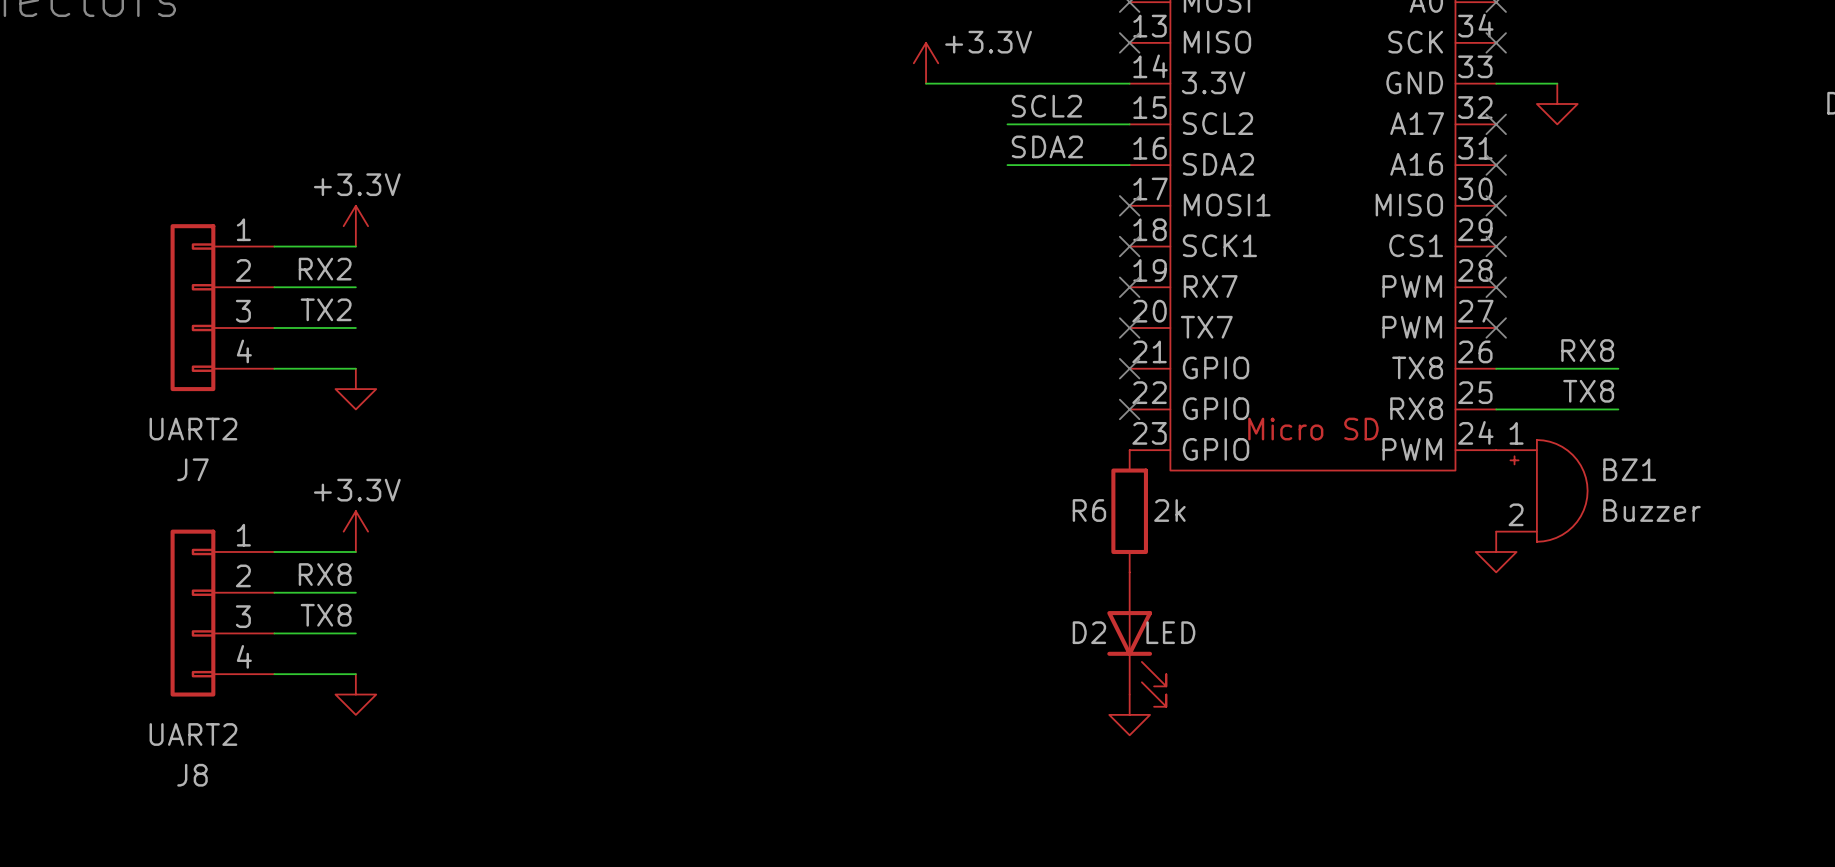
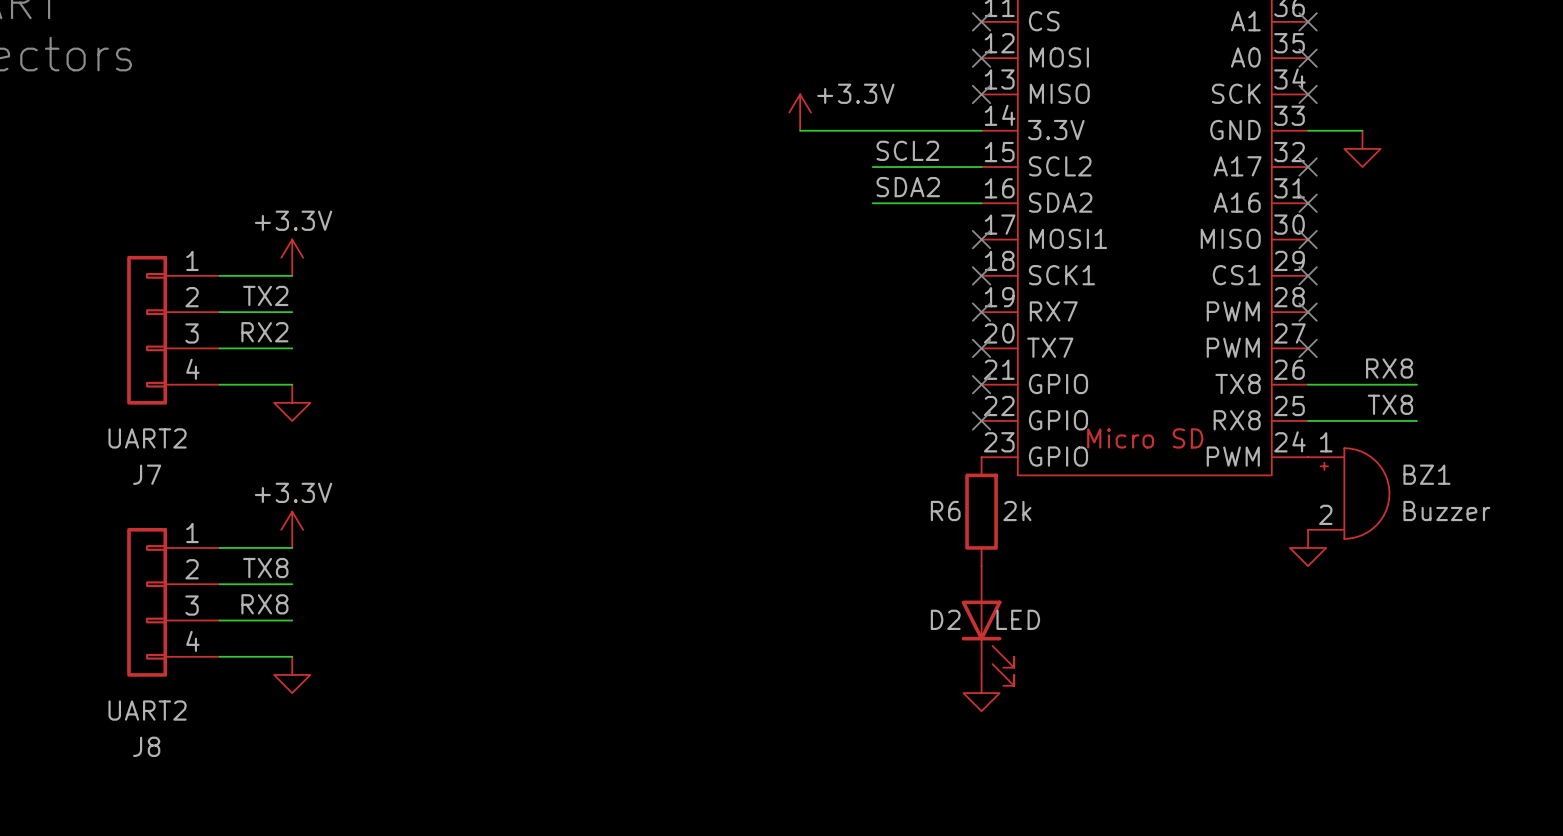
label: RX2 (325, 269) -> TX2 (265, 295)
label: TX2 (326, 309) -> RX2 (264, 332)
label: RX8 (325, 574) -> TX8 (265, 568)
label: TX8 (326, 615) -> RX8 (264, 604)

